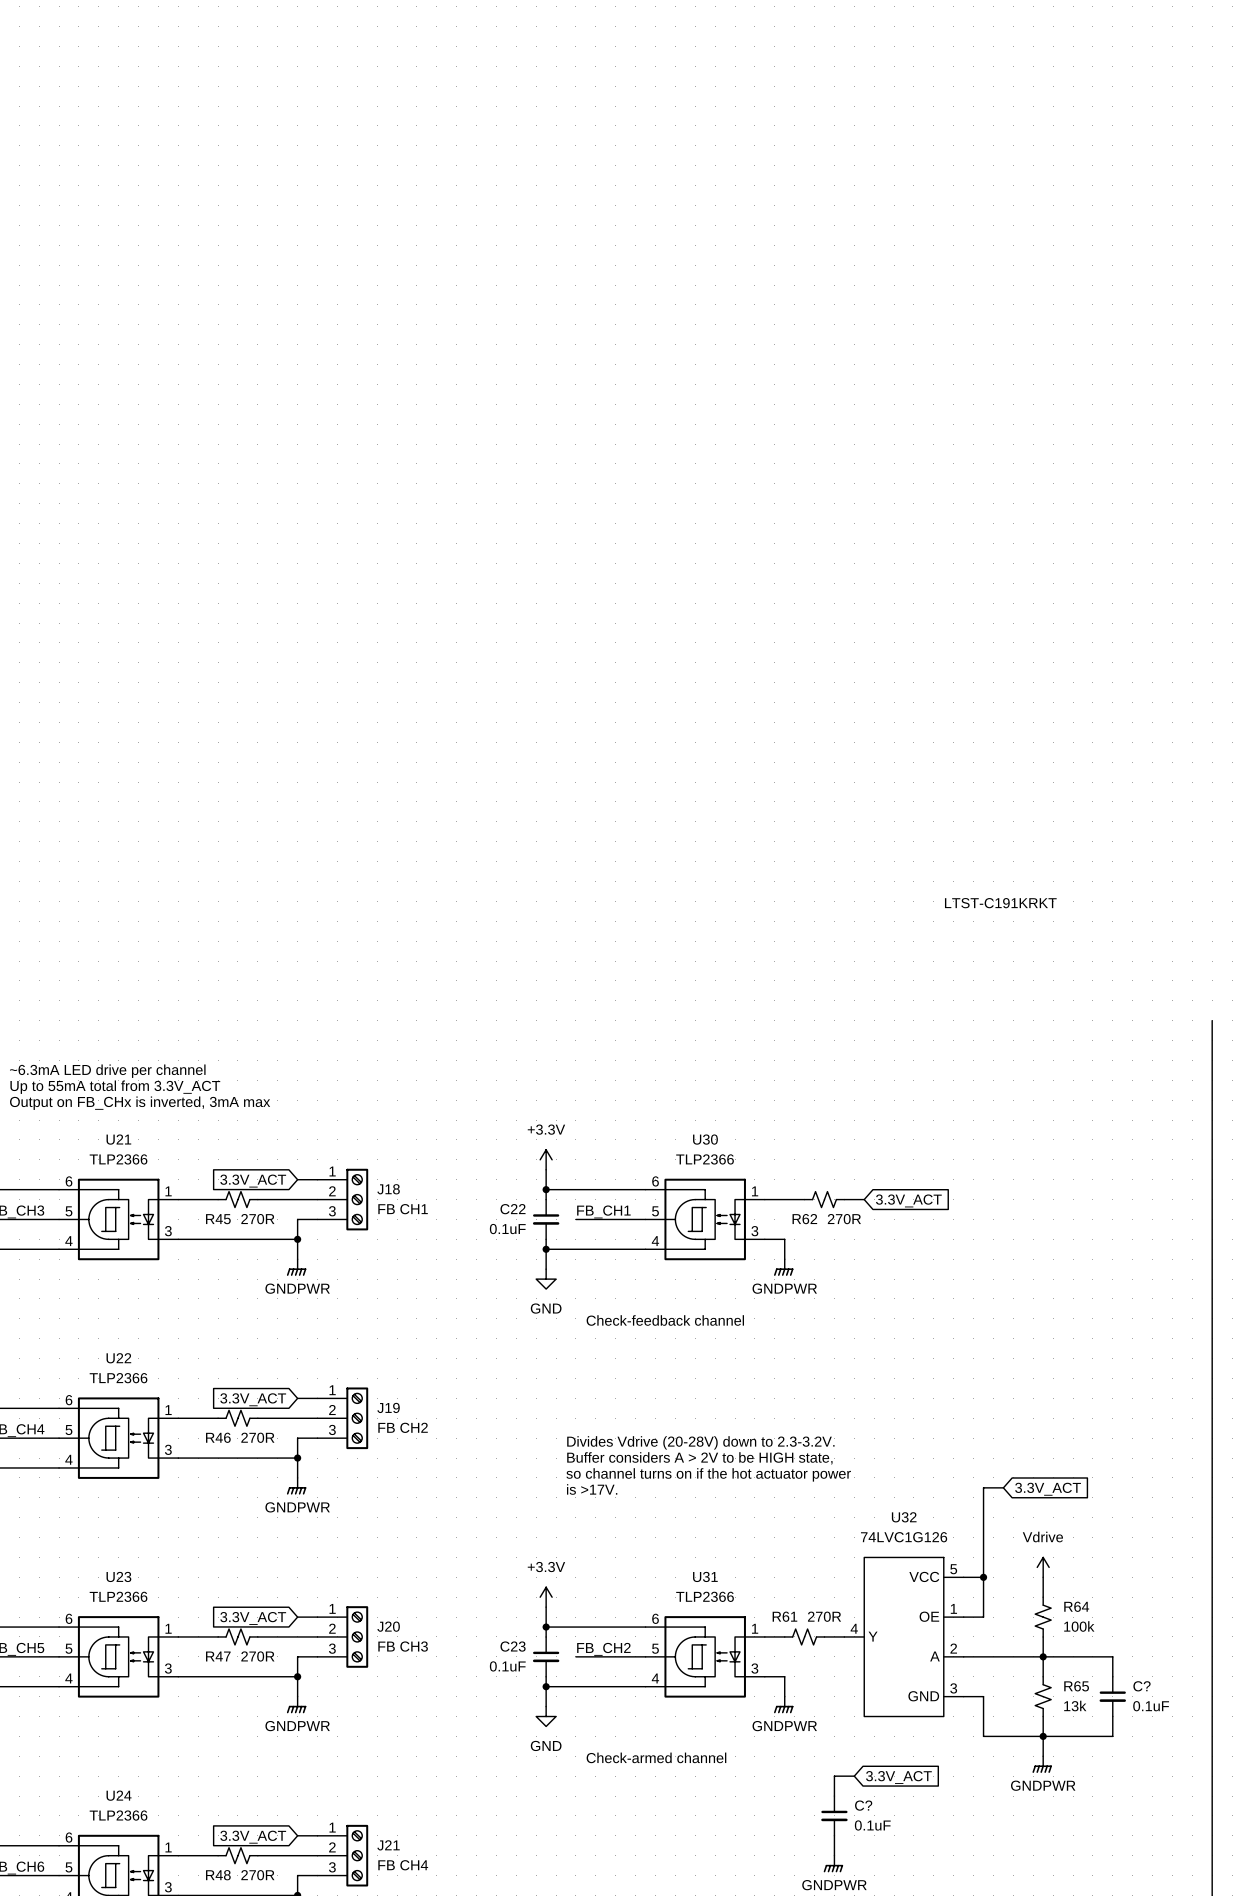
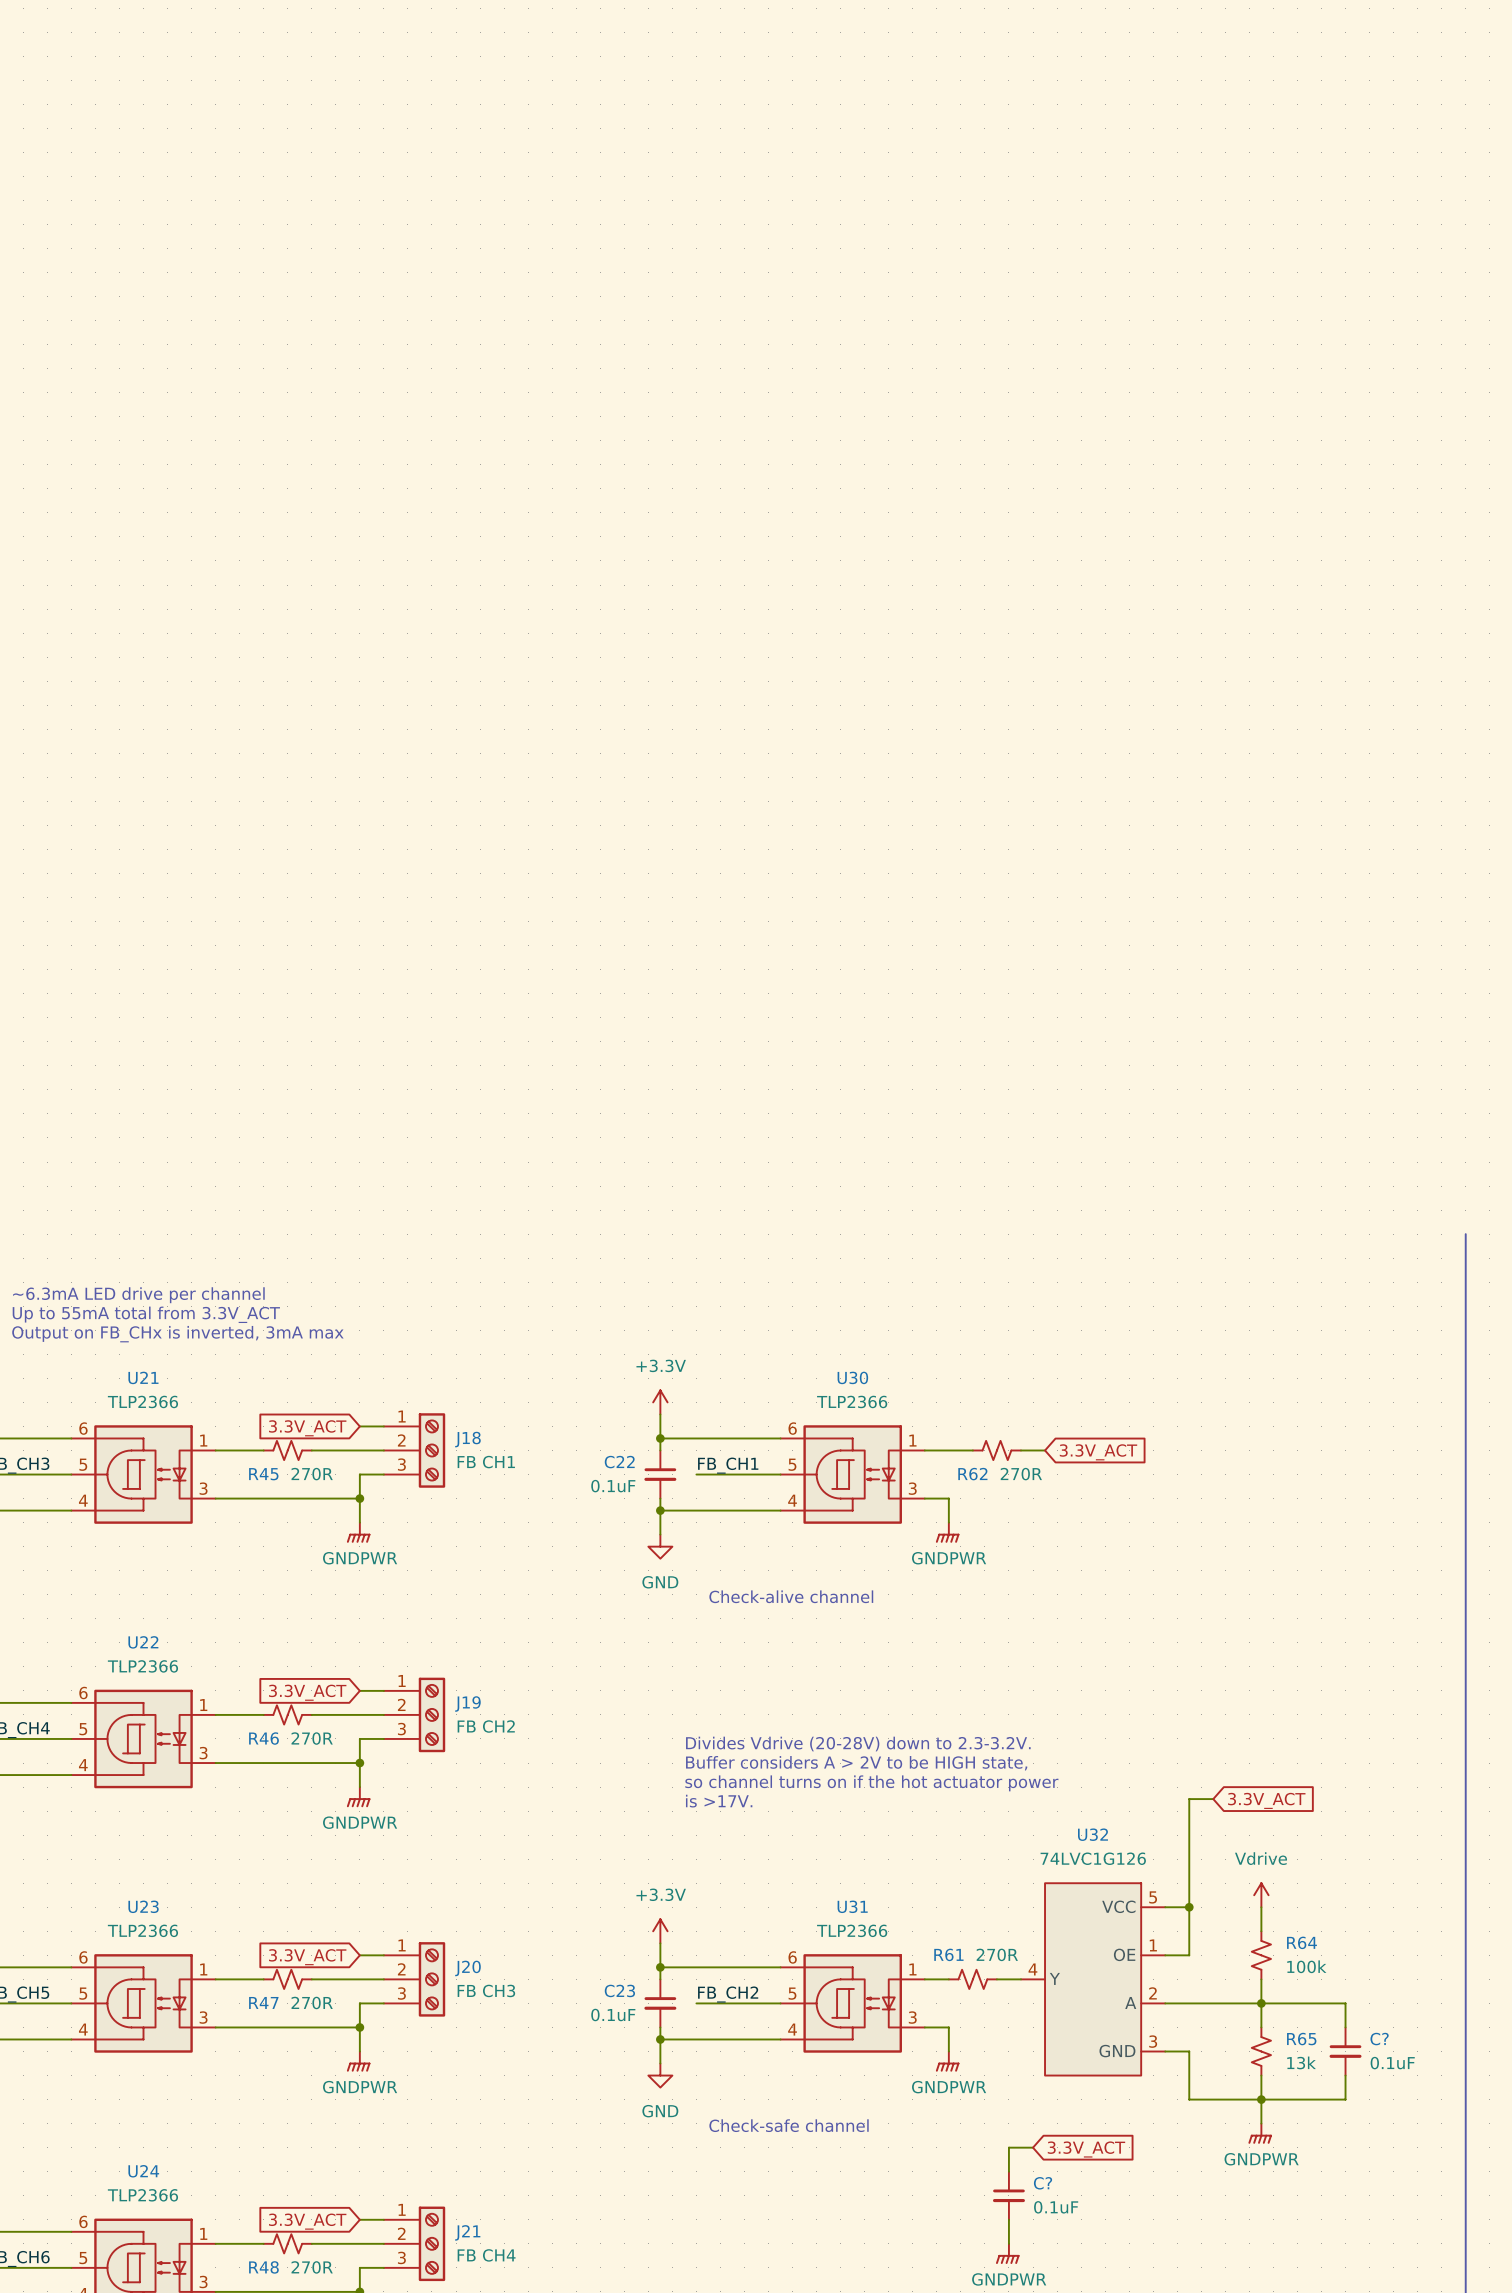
text: LTST-C191KRKT (1000, 903) -> none
text: Check-feedback channel (665, 1320) -> Check-alive channel (791, 1596)
text: Check-armed channel (656, 1757) -> Check-safe channel (789, 2125)

